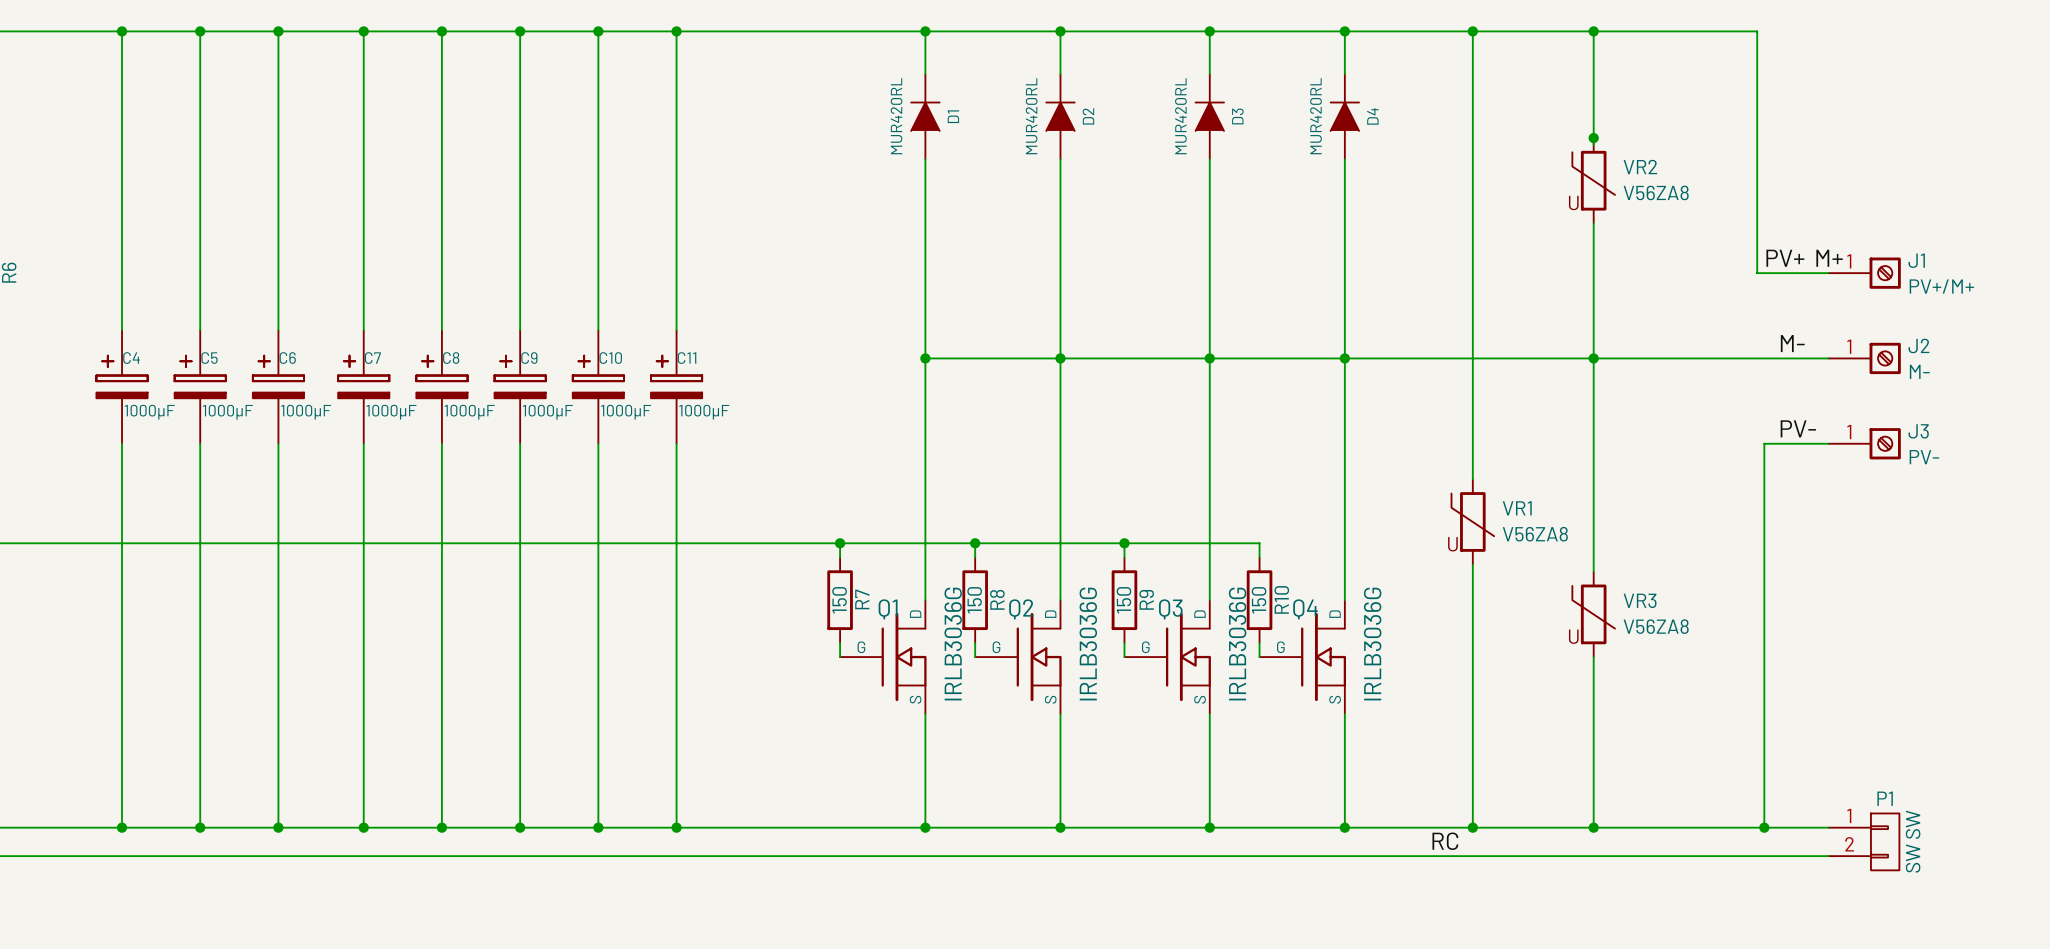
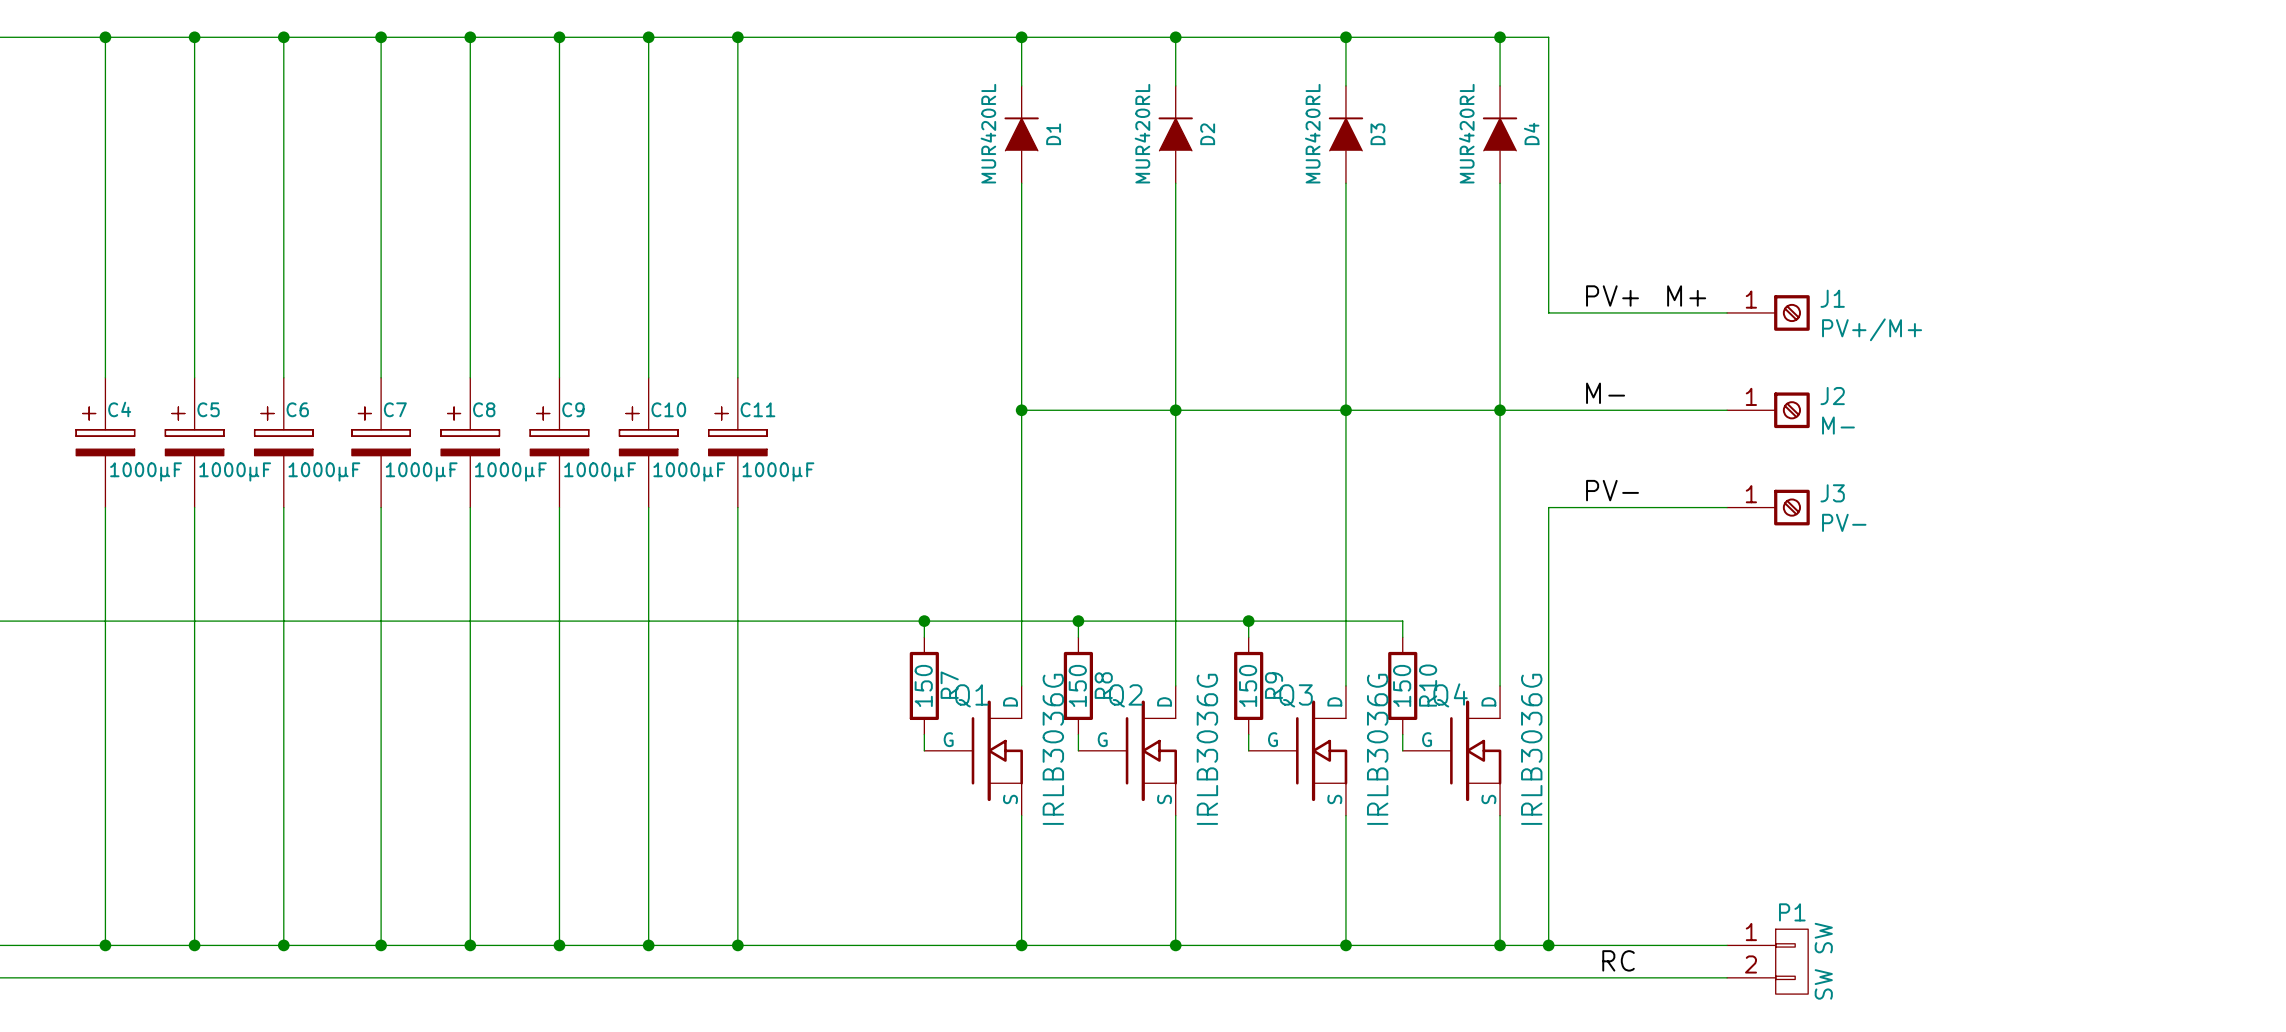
wire: (1387, 31) (1757, 31) (1757, 273) (1828, 273) -> (1548, 37) (1548, 312) (1727, 312)
wire: (1472, 31) (1472, 479) -> none
junction: (1472, 31) -> none
wire: (1593, 31) (1593, 145) -> none
junction: (1593, 31) -> none
junction: (1593, 138) -> none
VR2: V56ZA8 (1593, 180) -> none
wire: (1593, 223) (1593, 571) -> none
label: none -> PV+ (1612, 296)
label: none -> M+ (1686, 296)
label: PV+ (1785, 258) -> none
label: M+ (1829, 258) -> none
J1 position: (1864, 273) -> (1768, 312)
label: none -> M- (1605, 393)
label: M- (1792, 343) -> none
wire: (1543, 358) (1828, 358) -> none
junction: (1593, 358) -> none
J2 position: (1864, 358) -> (1768, 410)
label: none -> PV- (1612, 490)
label: PV- (1798, 428) -> none
wire: none -> (1727, 507) (1548, 507) (1548, 945)
wire: (1828, 443) (1764, 443) (1764, 827) -> none
J3 position: (1864, 443) -> (1768, 507)
VR1: V56ZA8 (1472, 521) -> none
wire: (1472, 564) (1472, 827) -> none
VR3: V56ZA8 (1593, 614) -> none
wire: (1593, 657) (1593, 827) -> none
junction: none -> (1548, 945)
junction: (1472, 827) -> none
wire: (1543, 827) (1828, 827) -> none
junction: (1593, 827) -> none
junction: (1764, 827) -> none
P1 position: (1863, 841) -> (1767, 961)
wire: (1543, 856) (1828, 856) -> none

